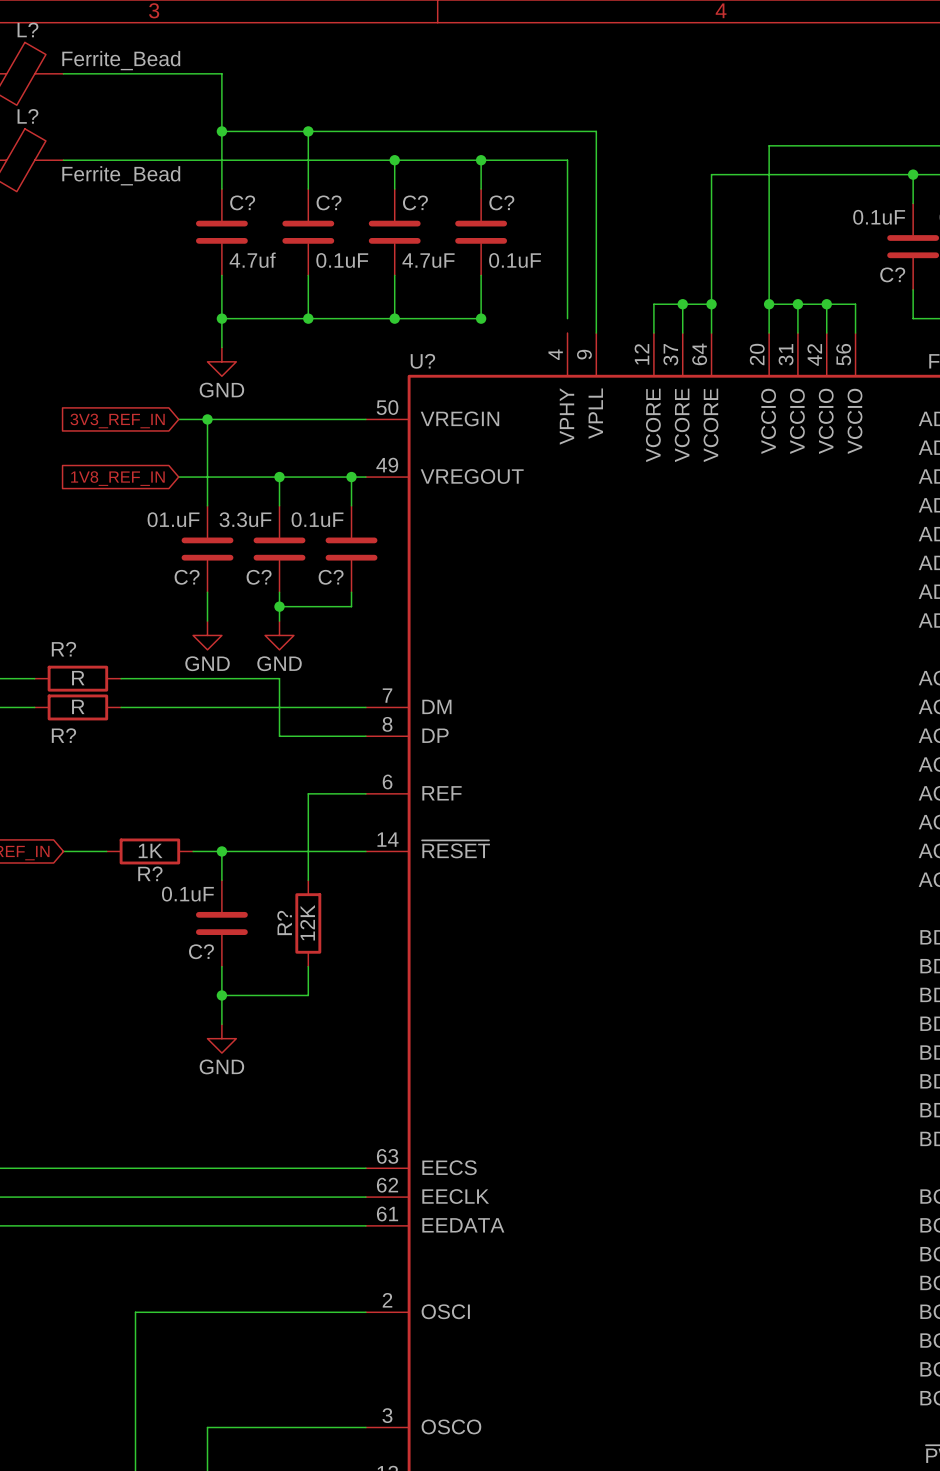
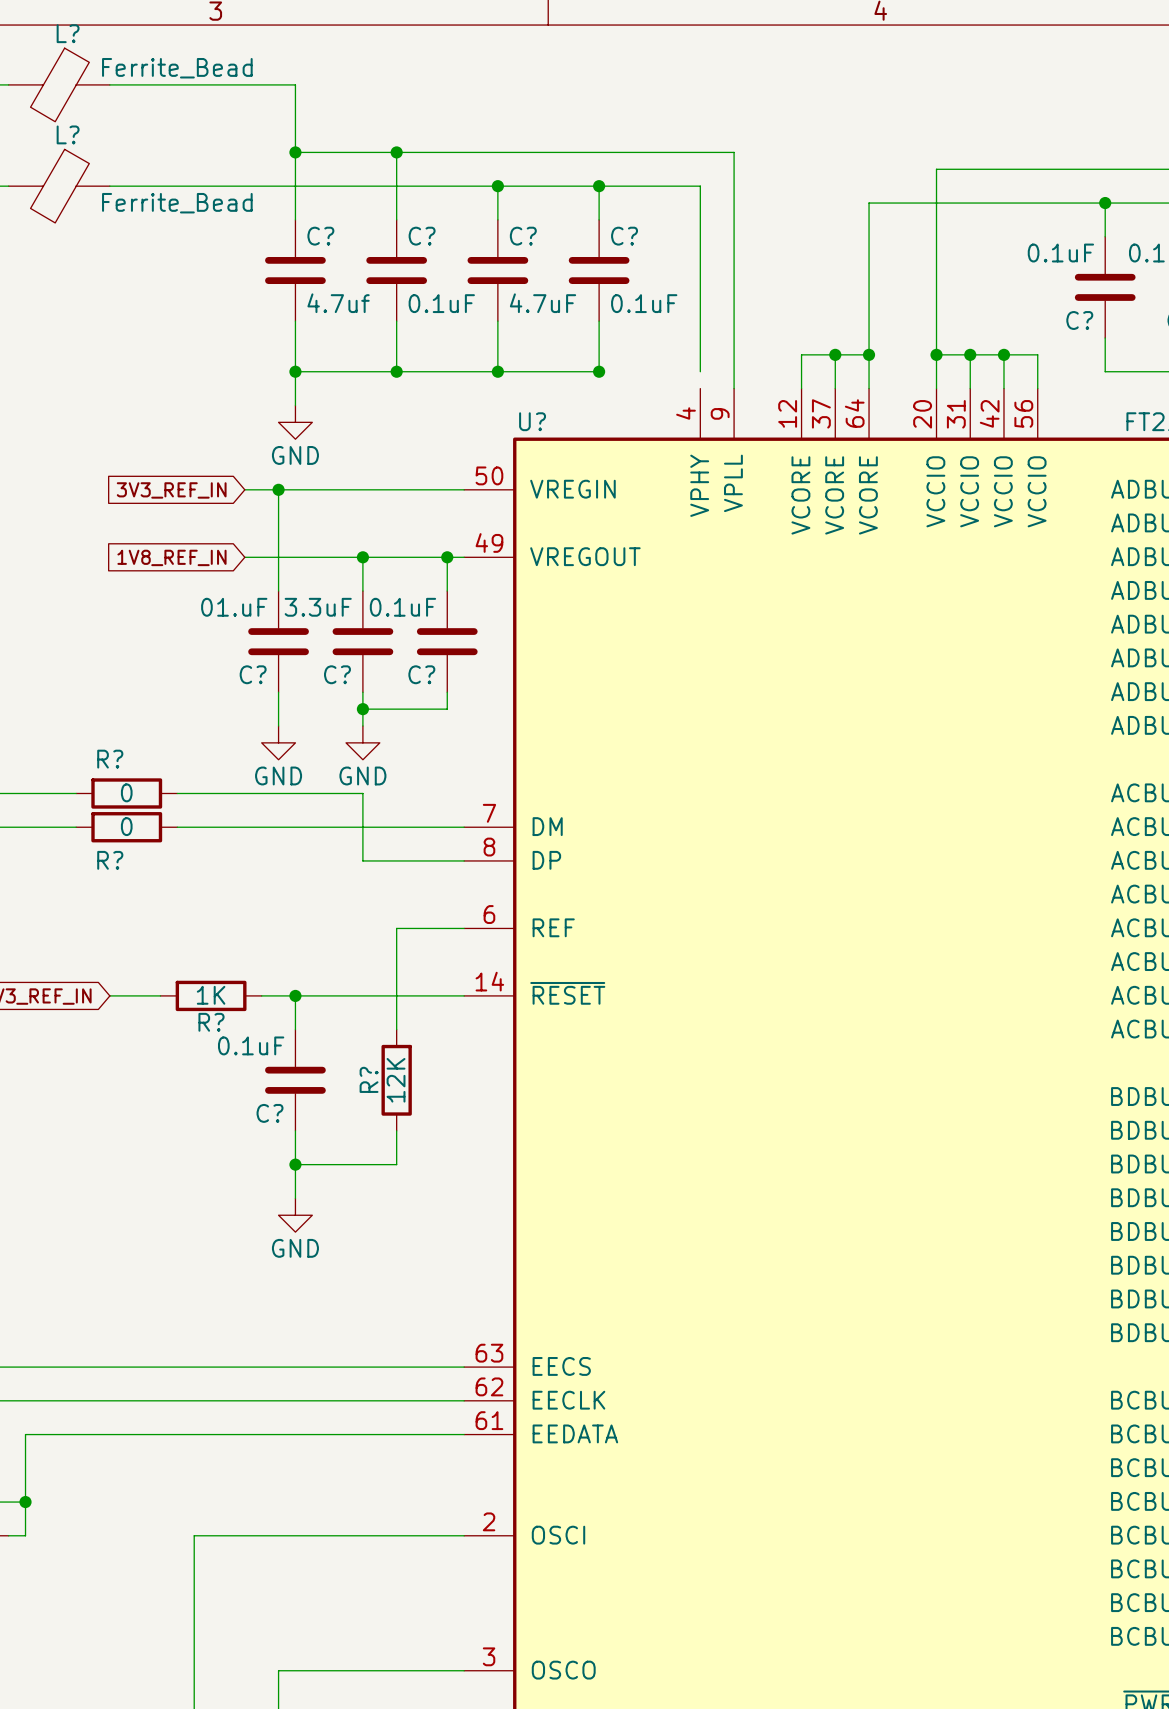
R? value: R (78, 678) -> 0 (126, 792)
R? value: R (78, 706) -> 0 (126, 826)

